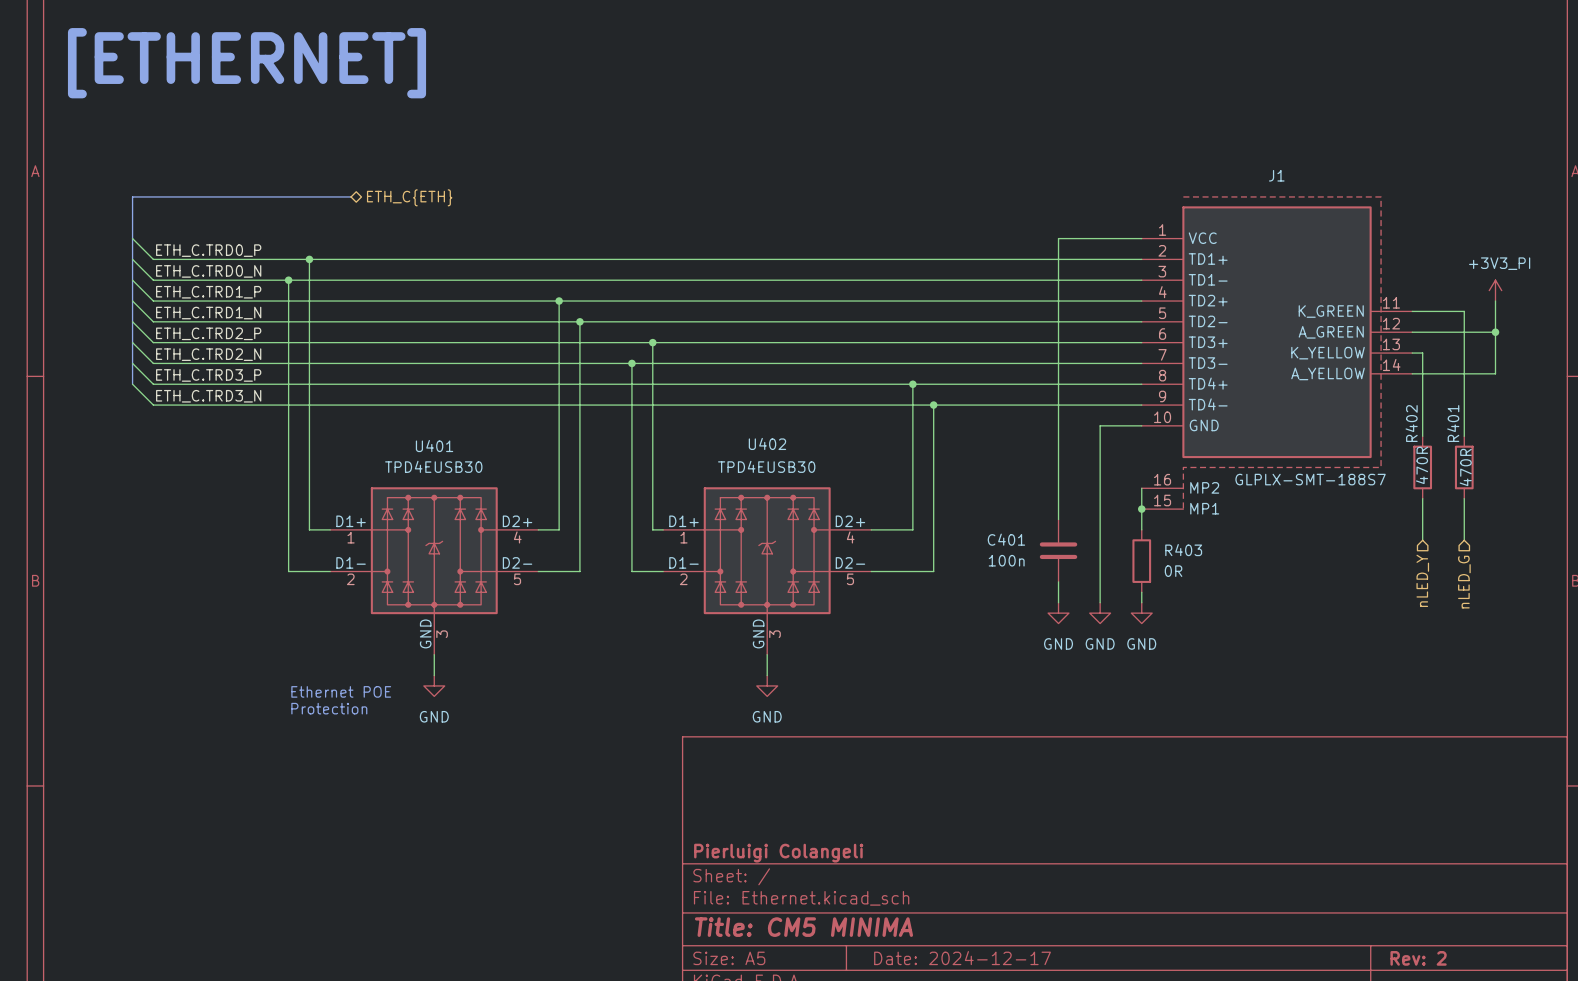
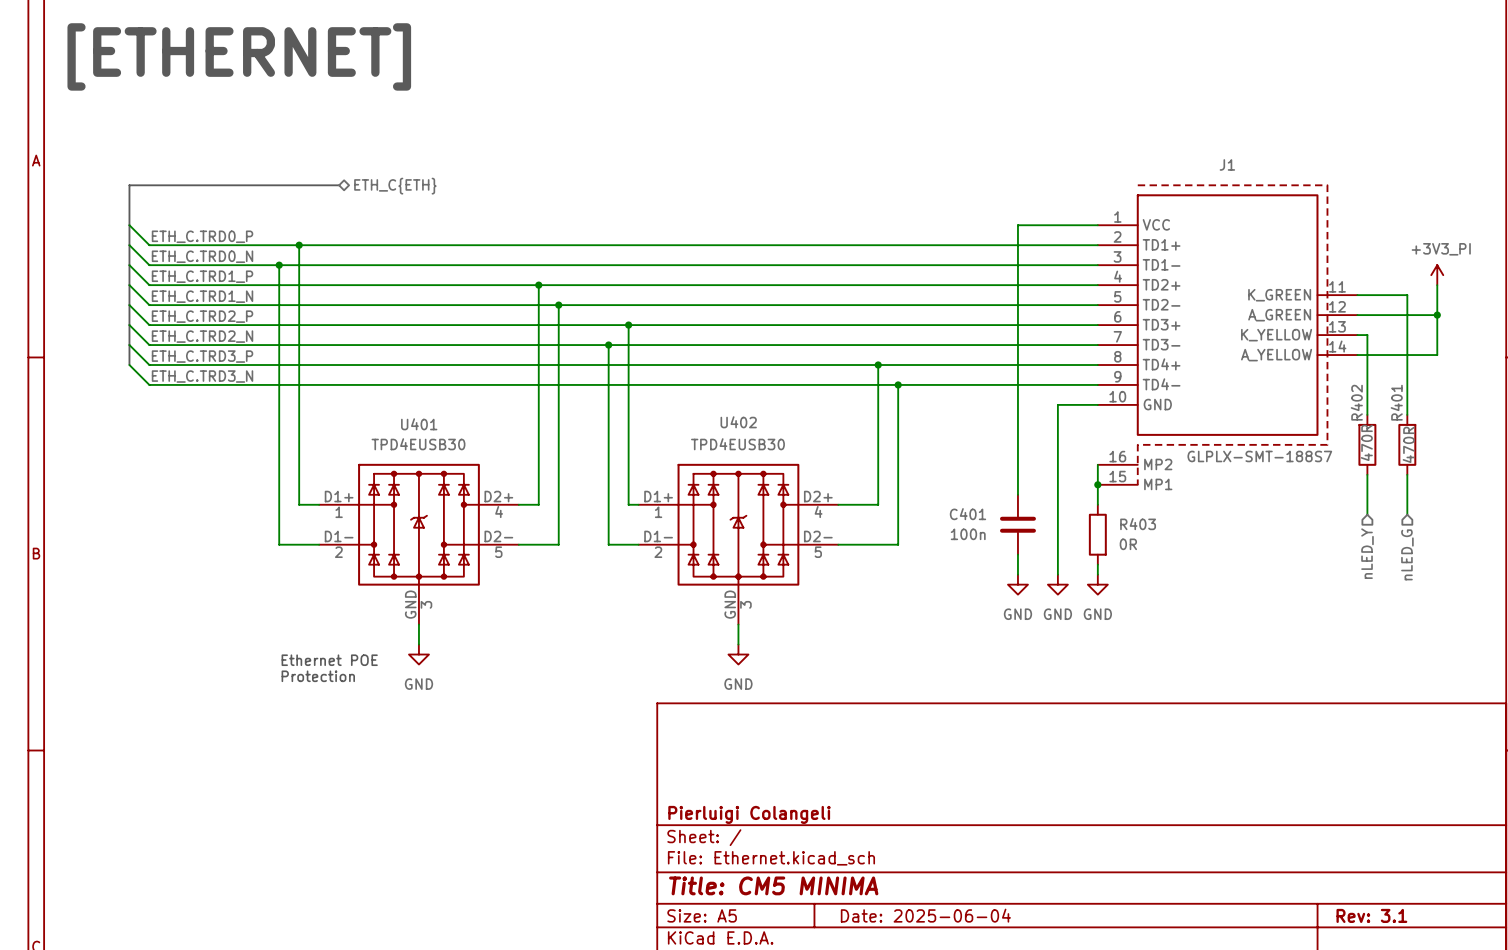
title block: Date: 2024-12-17 (962, 958) -> Date: 2025-06-04 (925, 915)
title block: Rev: 2 (1418, 958) -> Rev: 3.1 (1371, 915)

